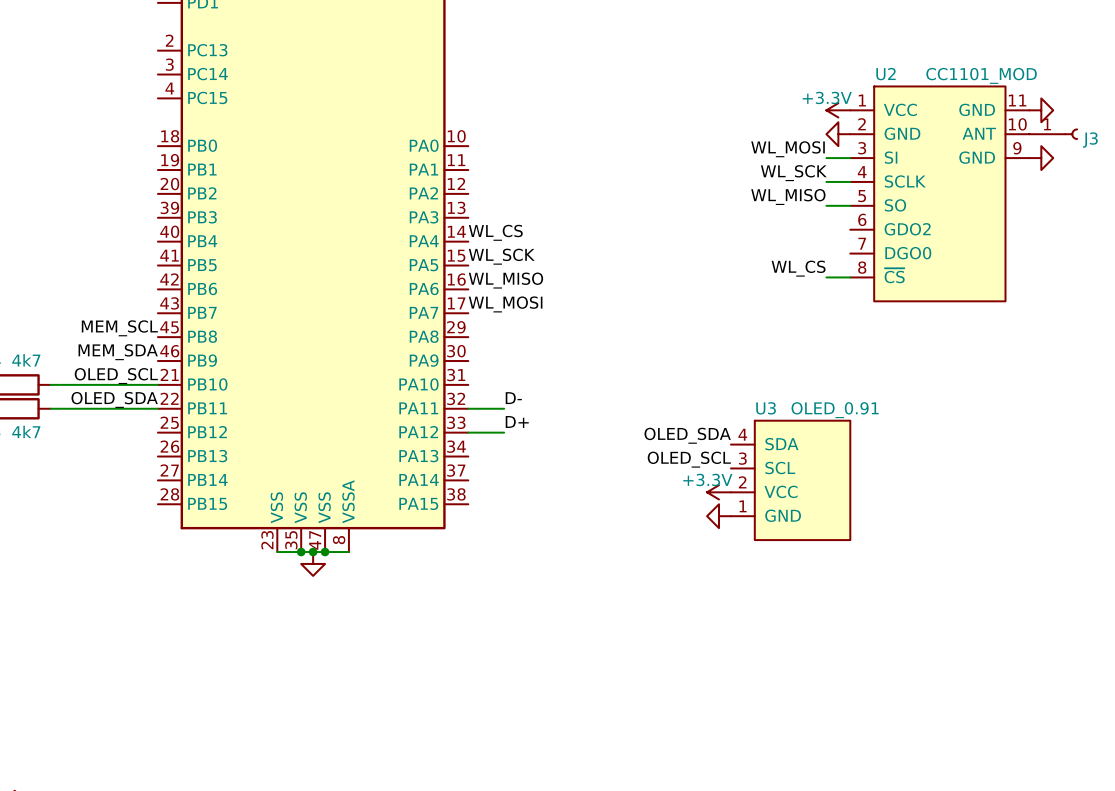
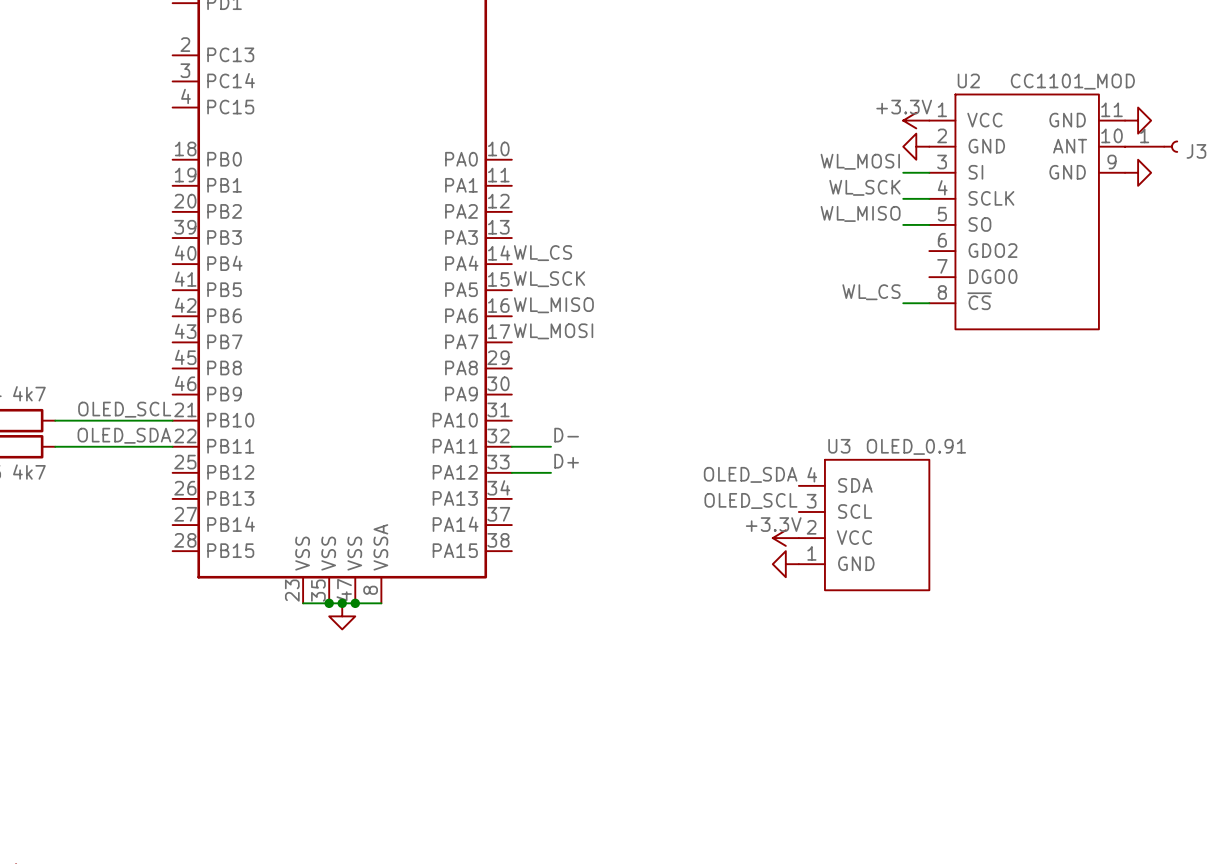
label: MEM_SCL (119, 328) -> none
label: MEM_SDA (118, 352) -> none

